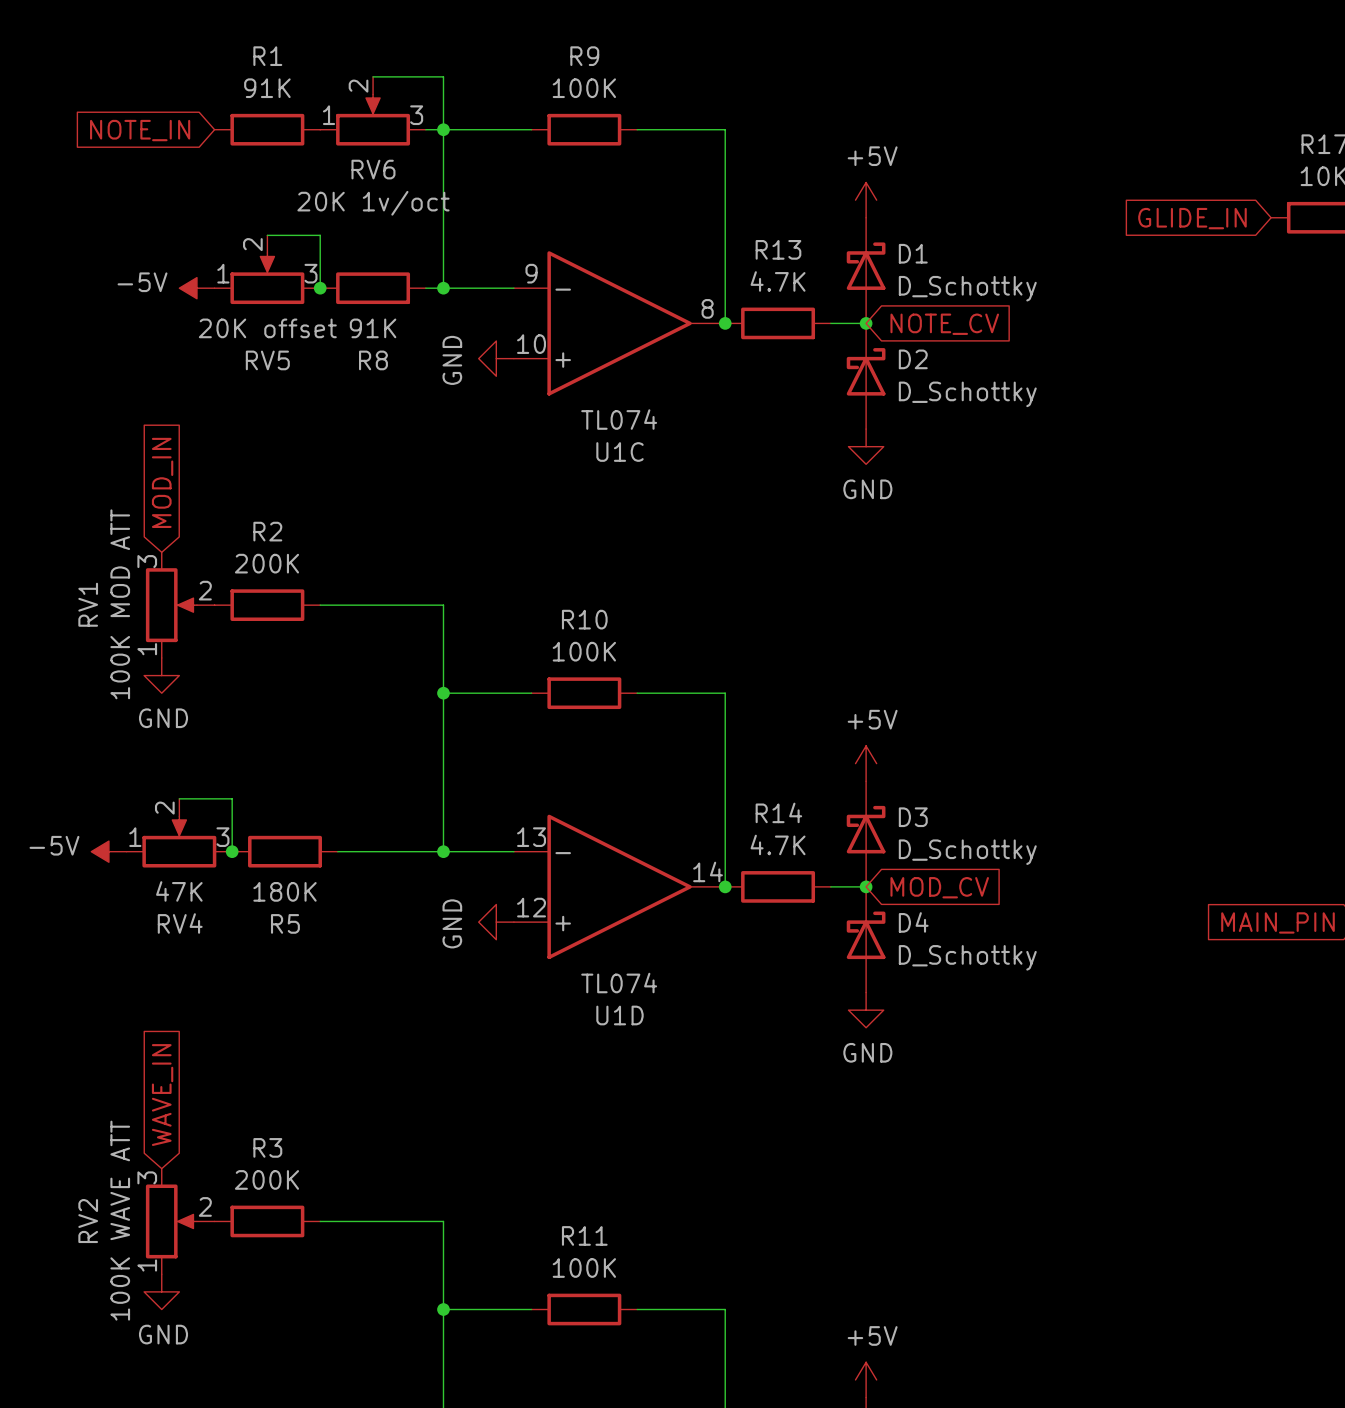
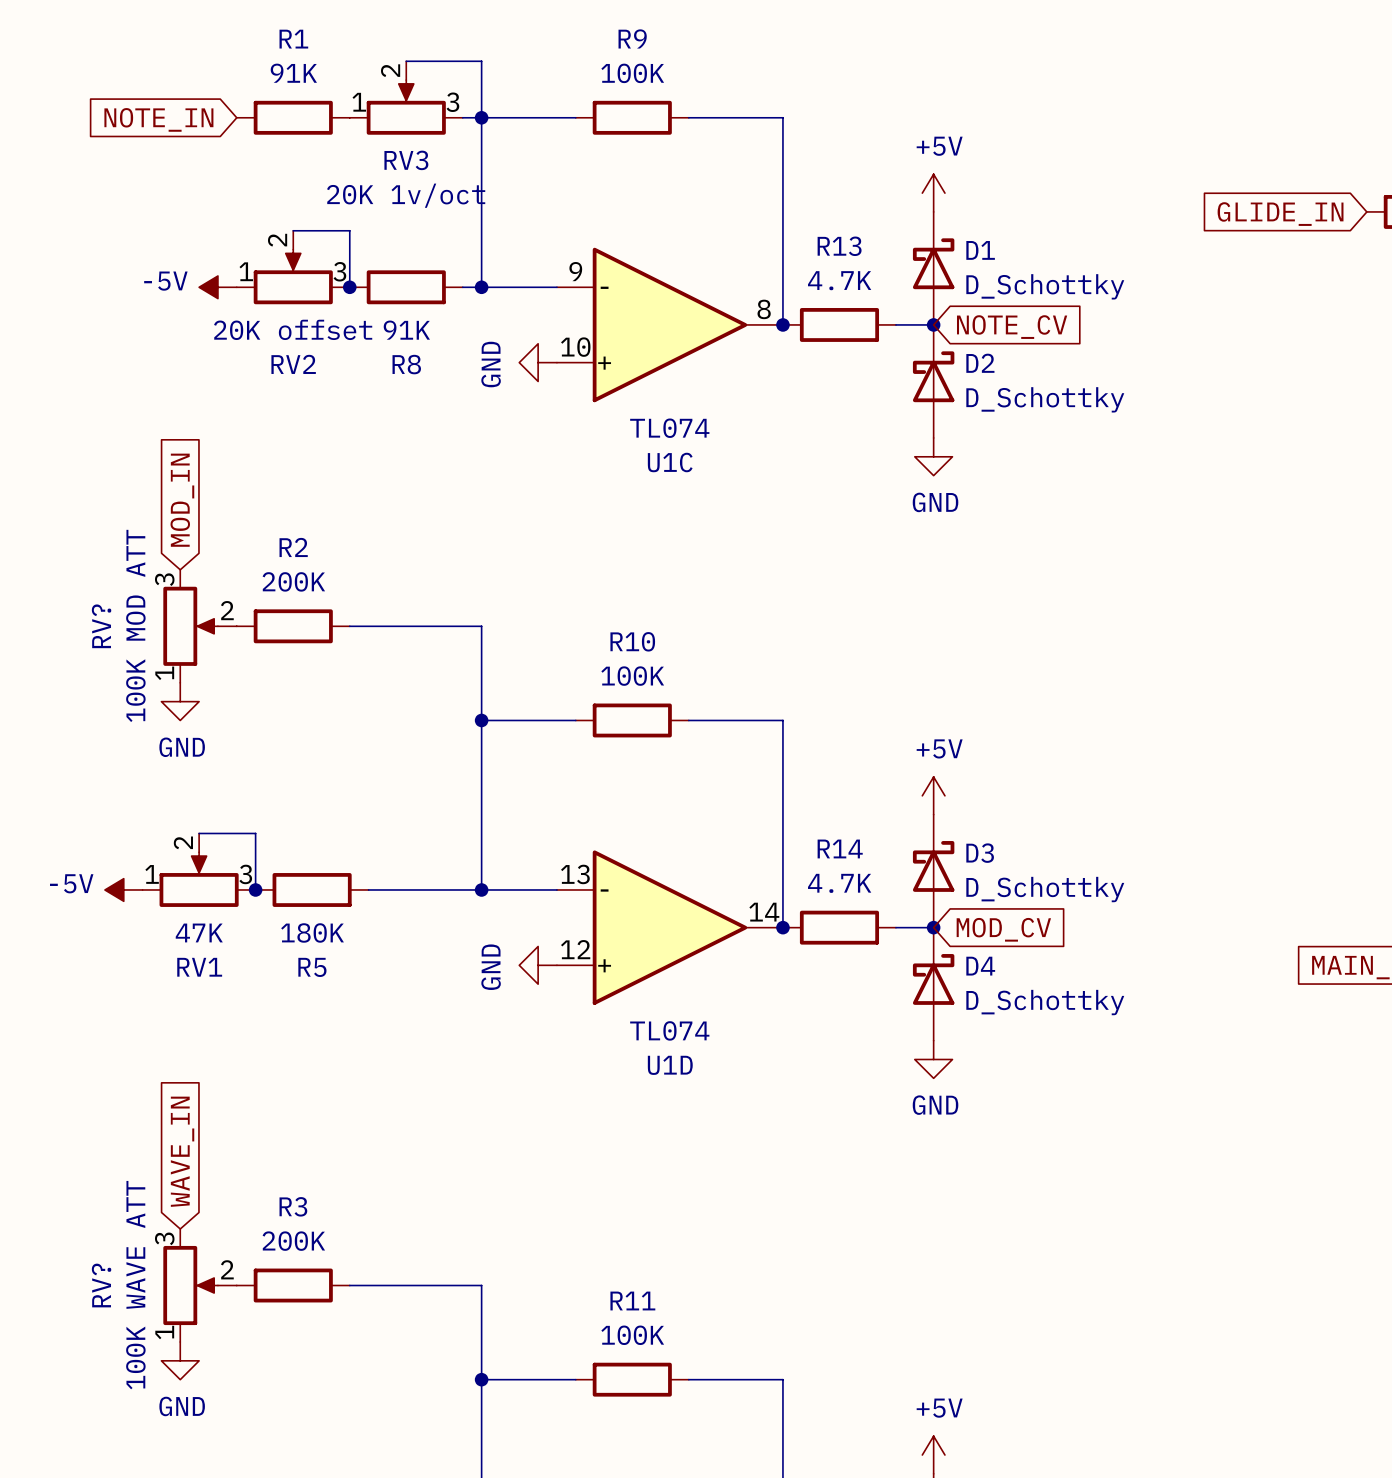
RV6 name: RV6 (373, 169) -> RV3 (406, 160)
RV5 name: RV5 (267, 360) -> RV2 (293, 364)
RV1 name: RV1 (88, 604) -> RV? (101, 626)
RV4 name: RV4 (180, 923) -> RV1 (199, 967)
RV2 name: RV2 (88, 1221) -> RV? (101, 1285)

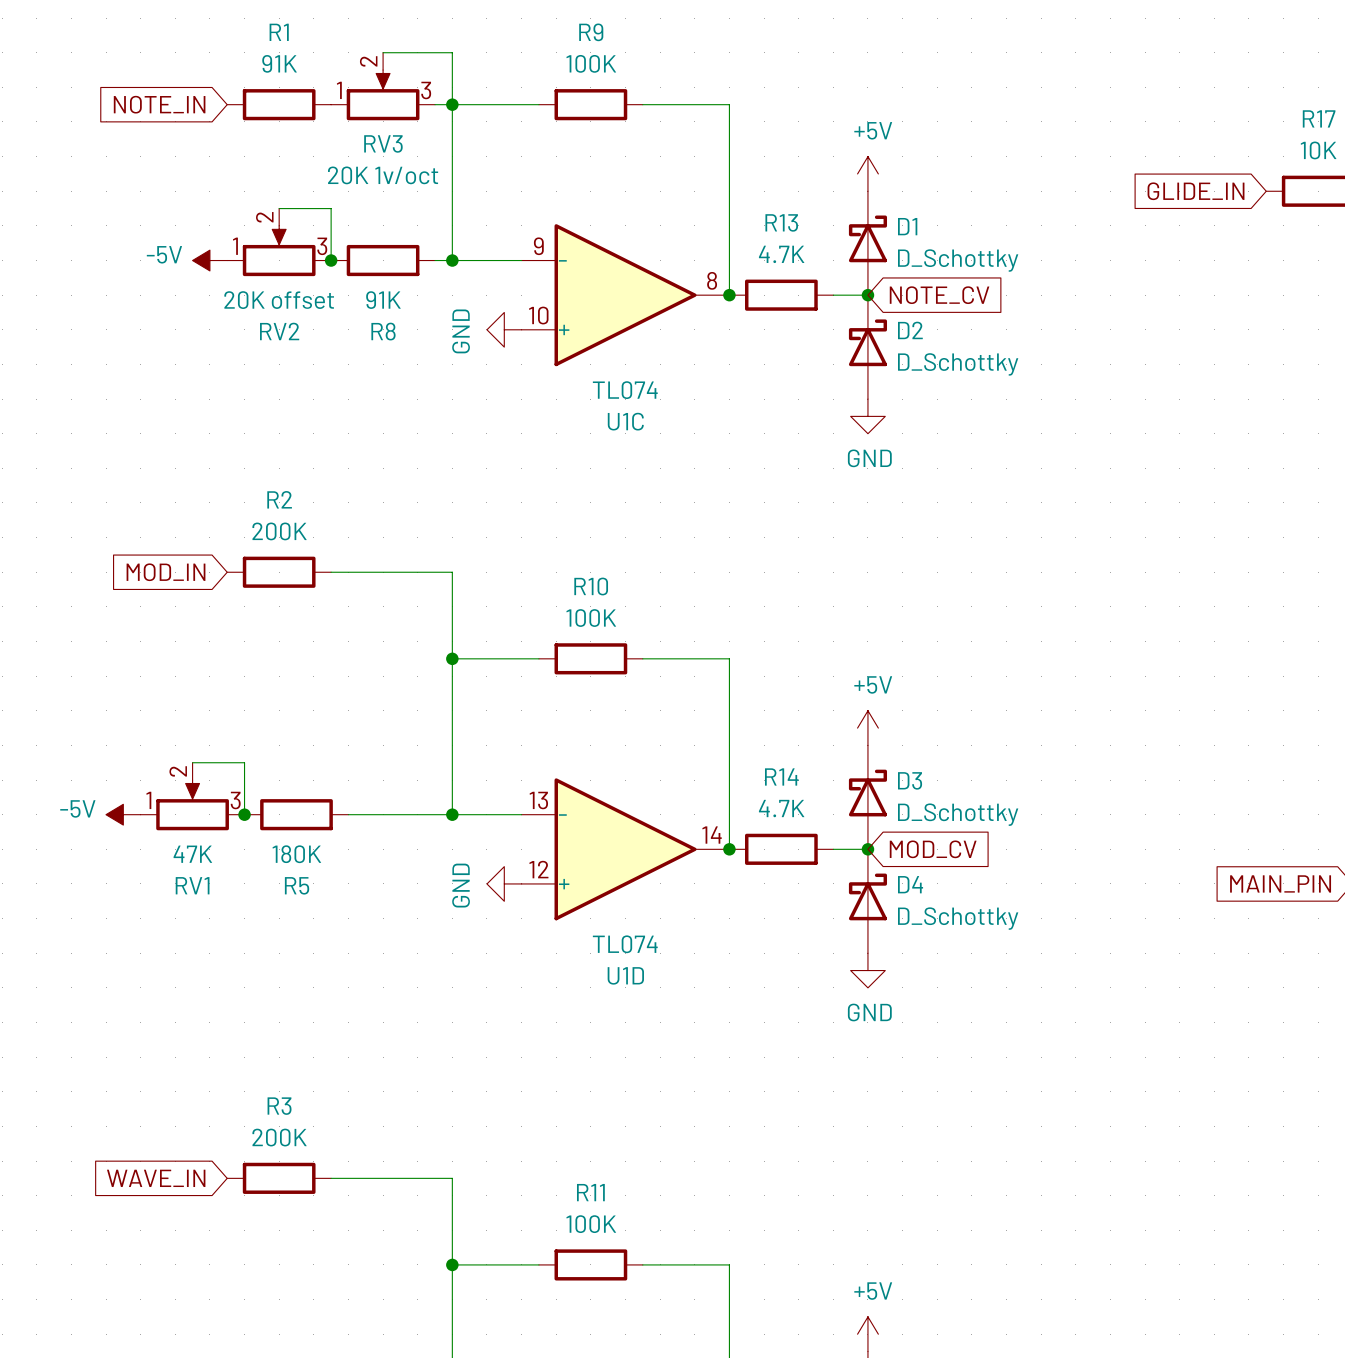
global label rotation: 0° (182, 500) -> 90° counterclockwise (166, 572)
RV?: 100K MOD ATT (200, 626) -> none
power symbol: GND (180, 701) -> none
global label rotation: 0° (182, 1151) -> 90° counterclockwise (156, 1178)
RV?: 100K WAVE ATT (200, 1285) -> none
power symbol: GND (180, 1360) -> none

